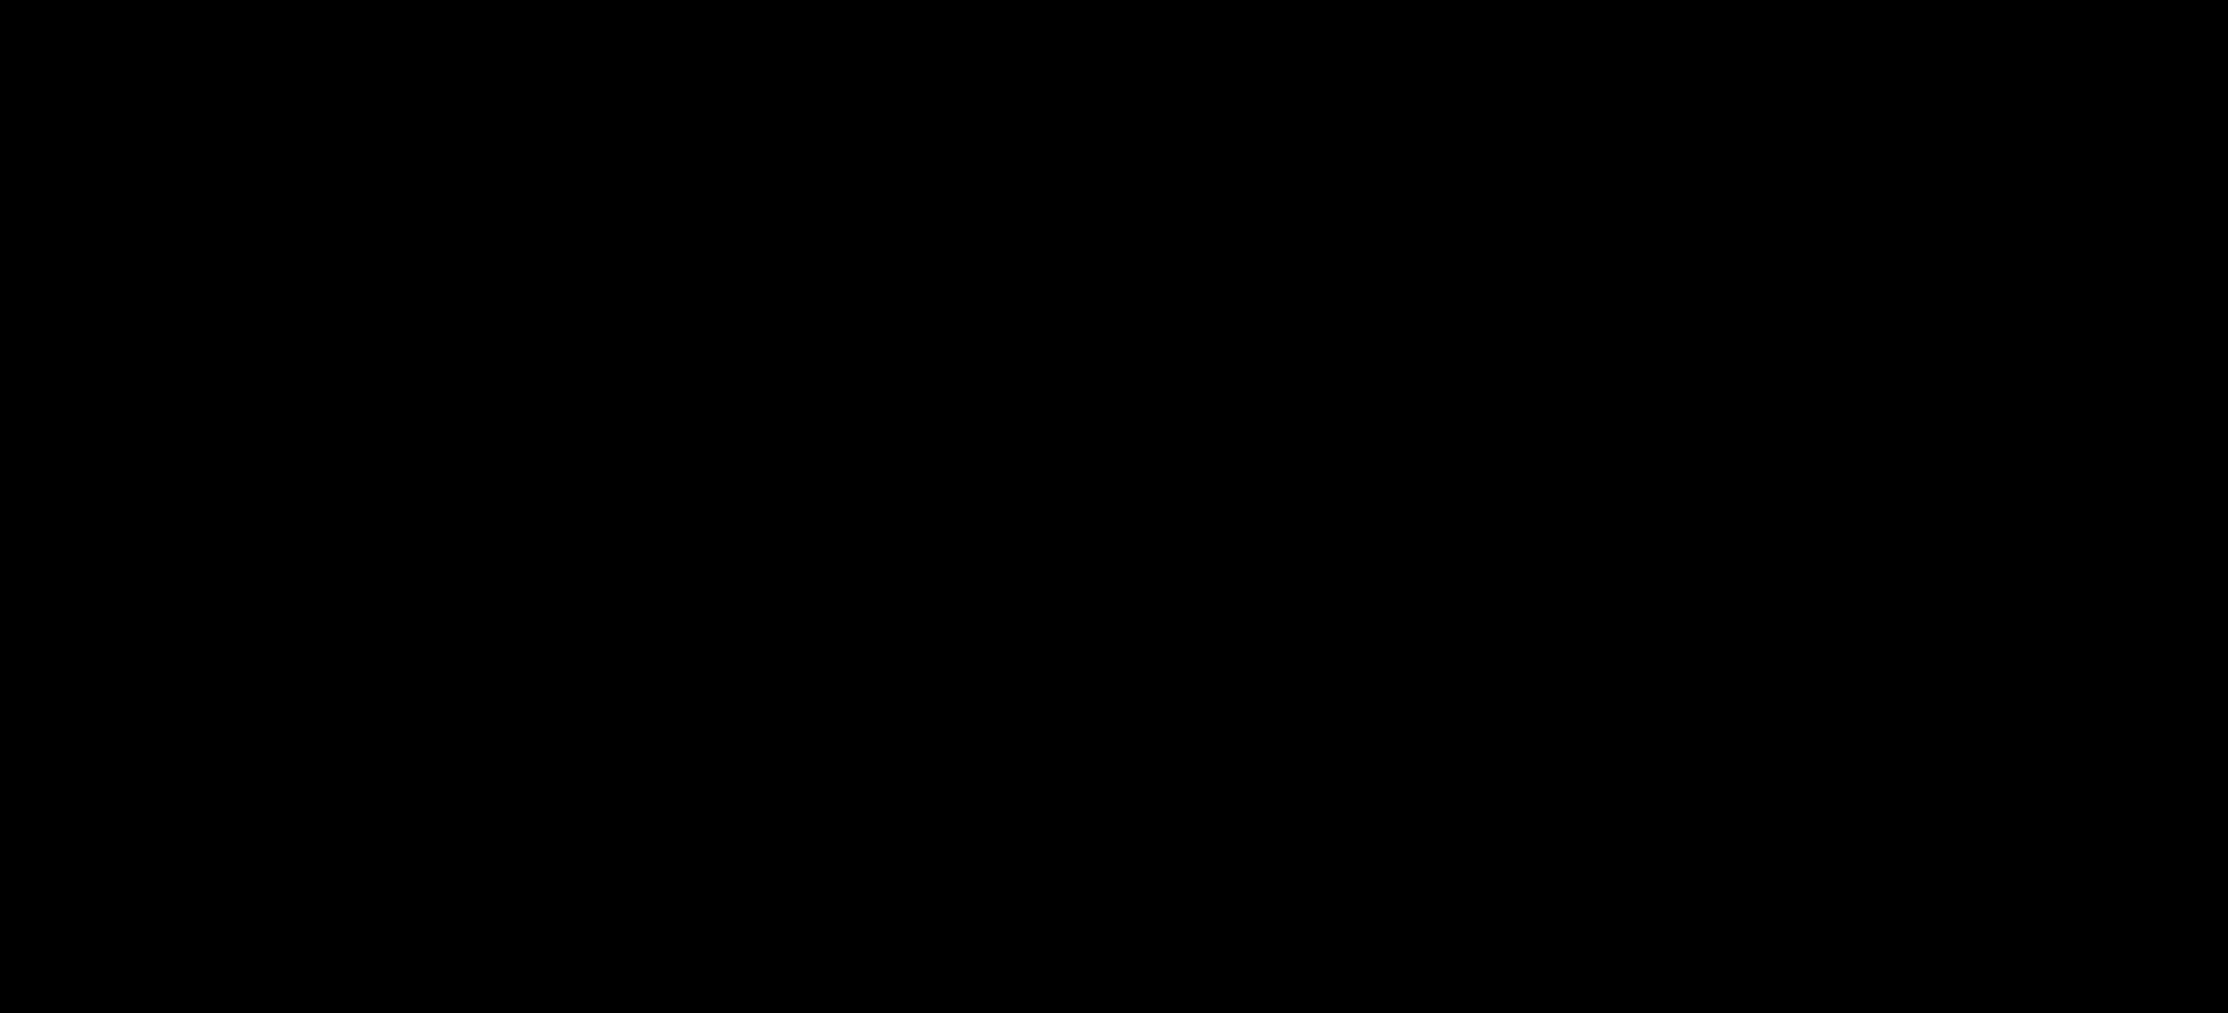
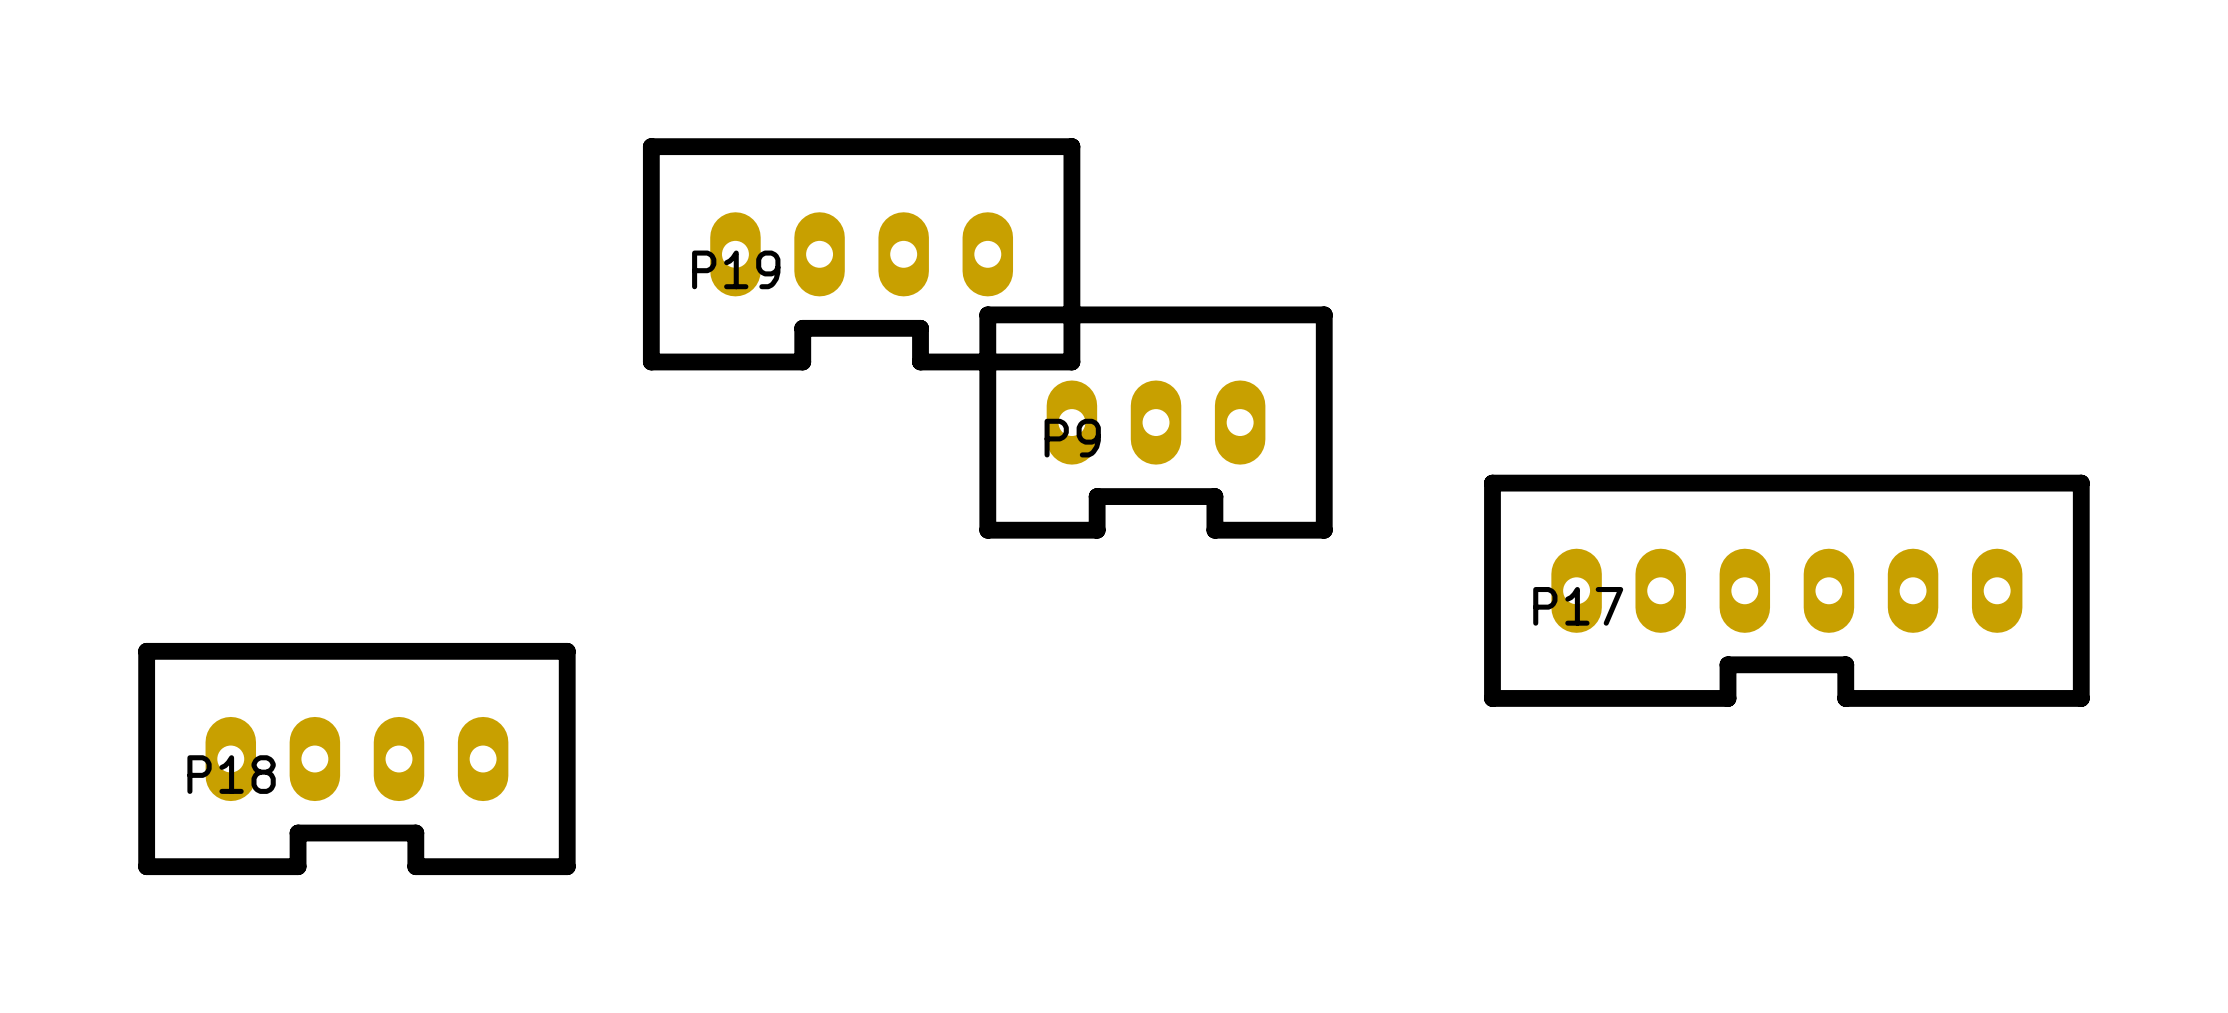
P19: none -> (861, 254)
P9: none -> (1156, 422)
P17: none -> (1786, 590)
P18: none -> (356, 759)

